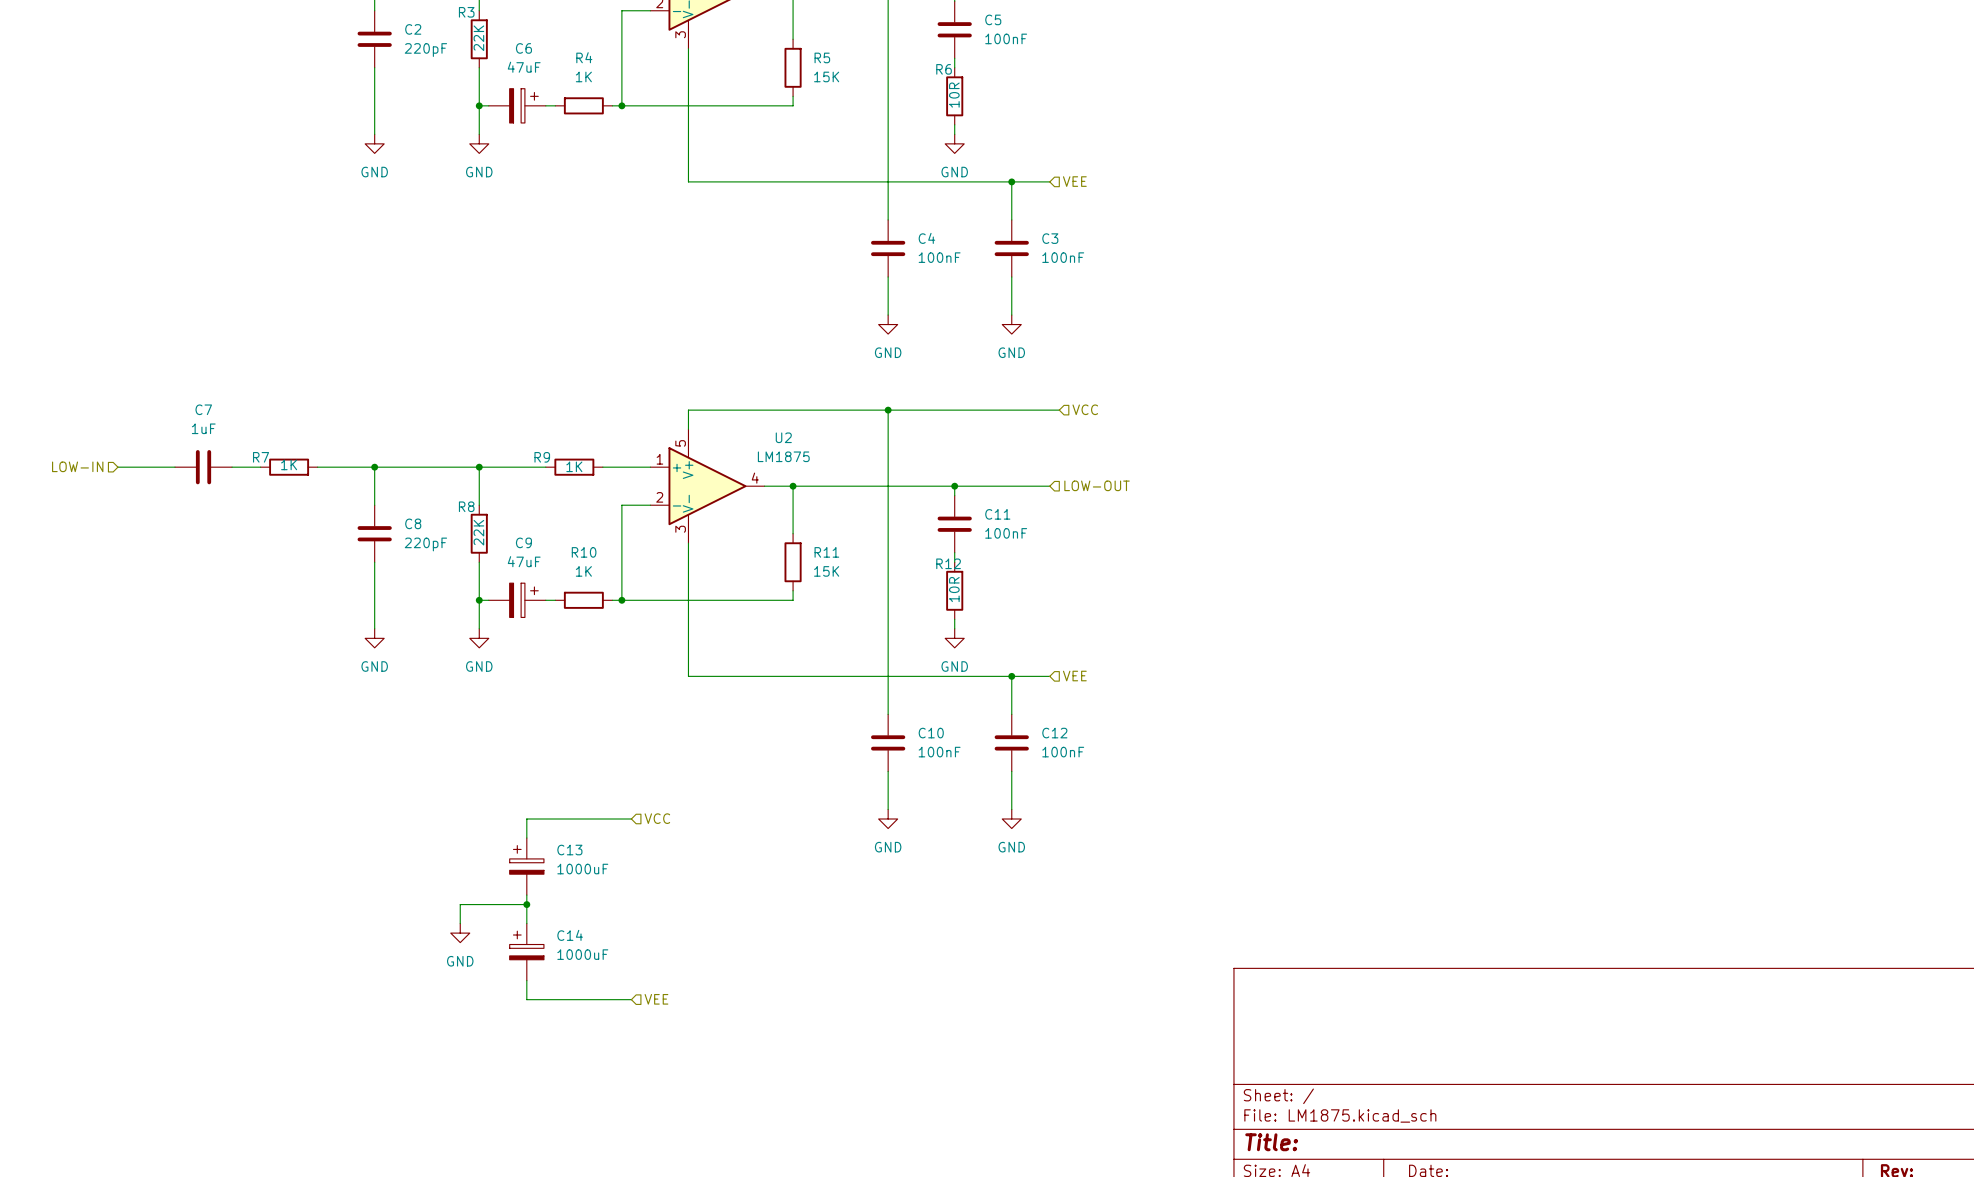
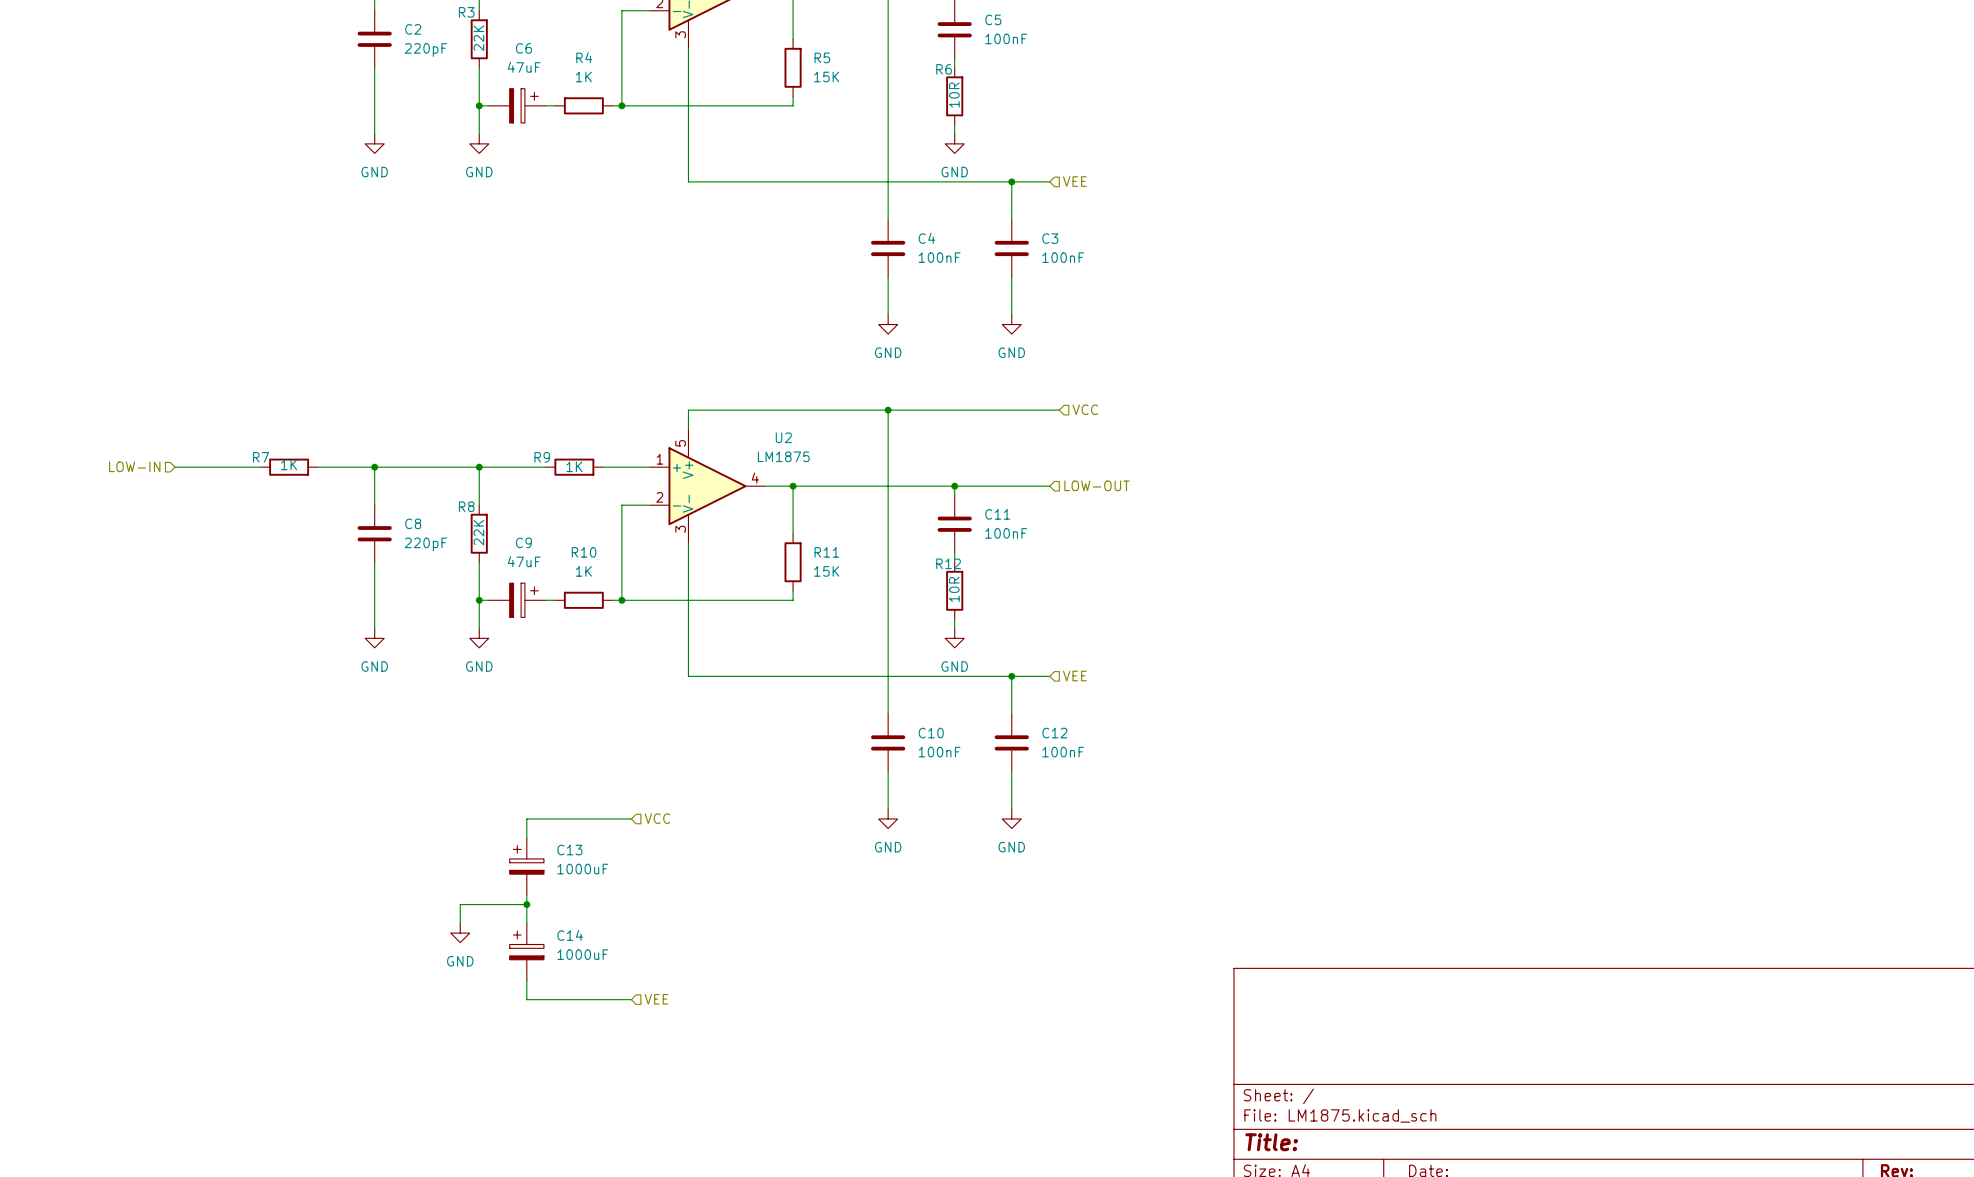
hierarchical label position: LOW-IN (77, 466) -> LOW-IN (134, 466)
C7: 1uF (203, 467) -> none

